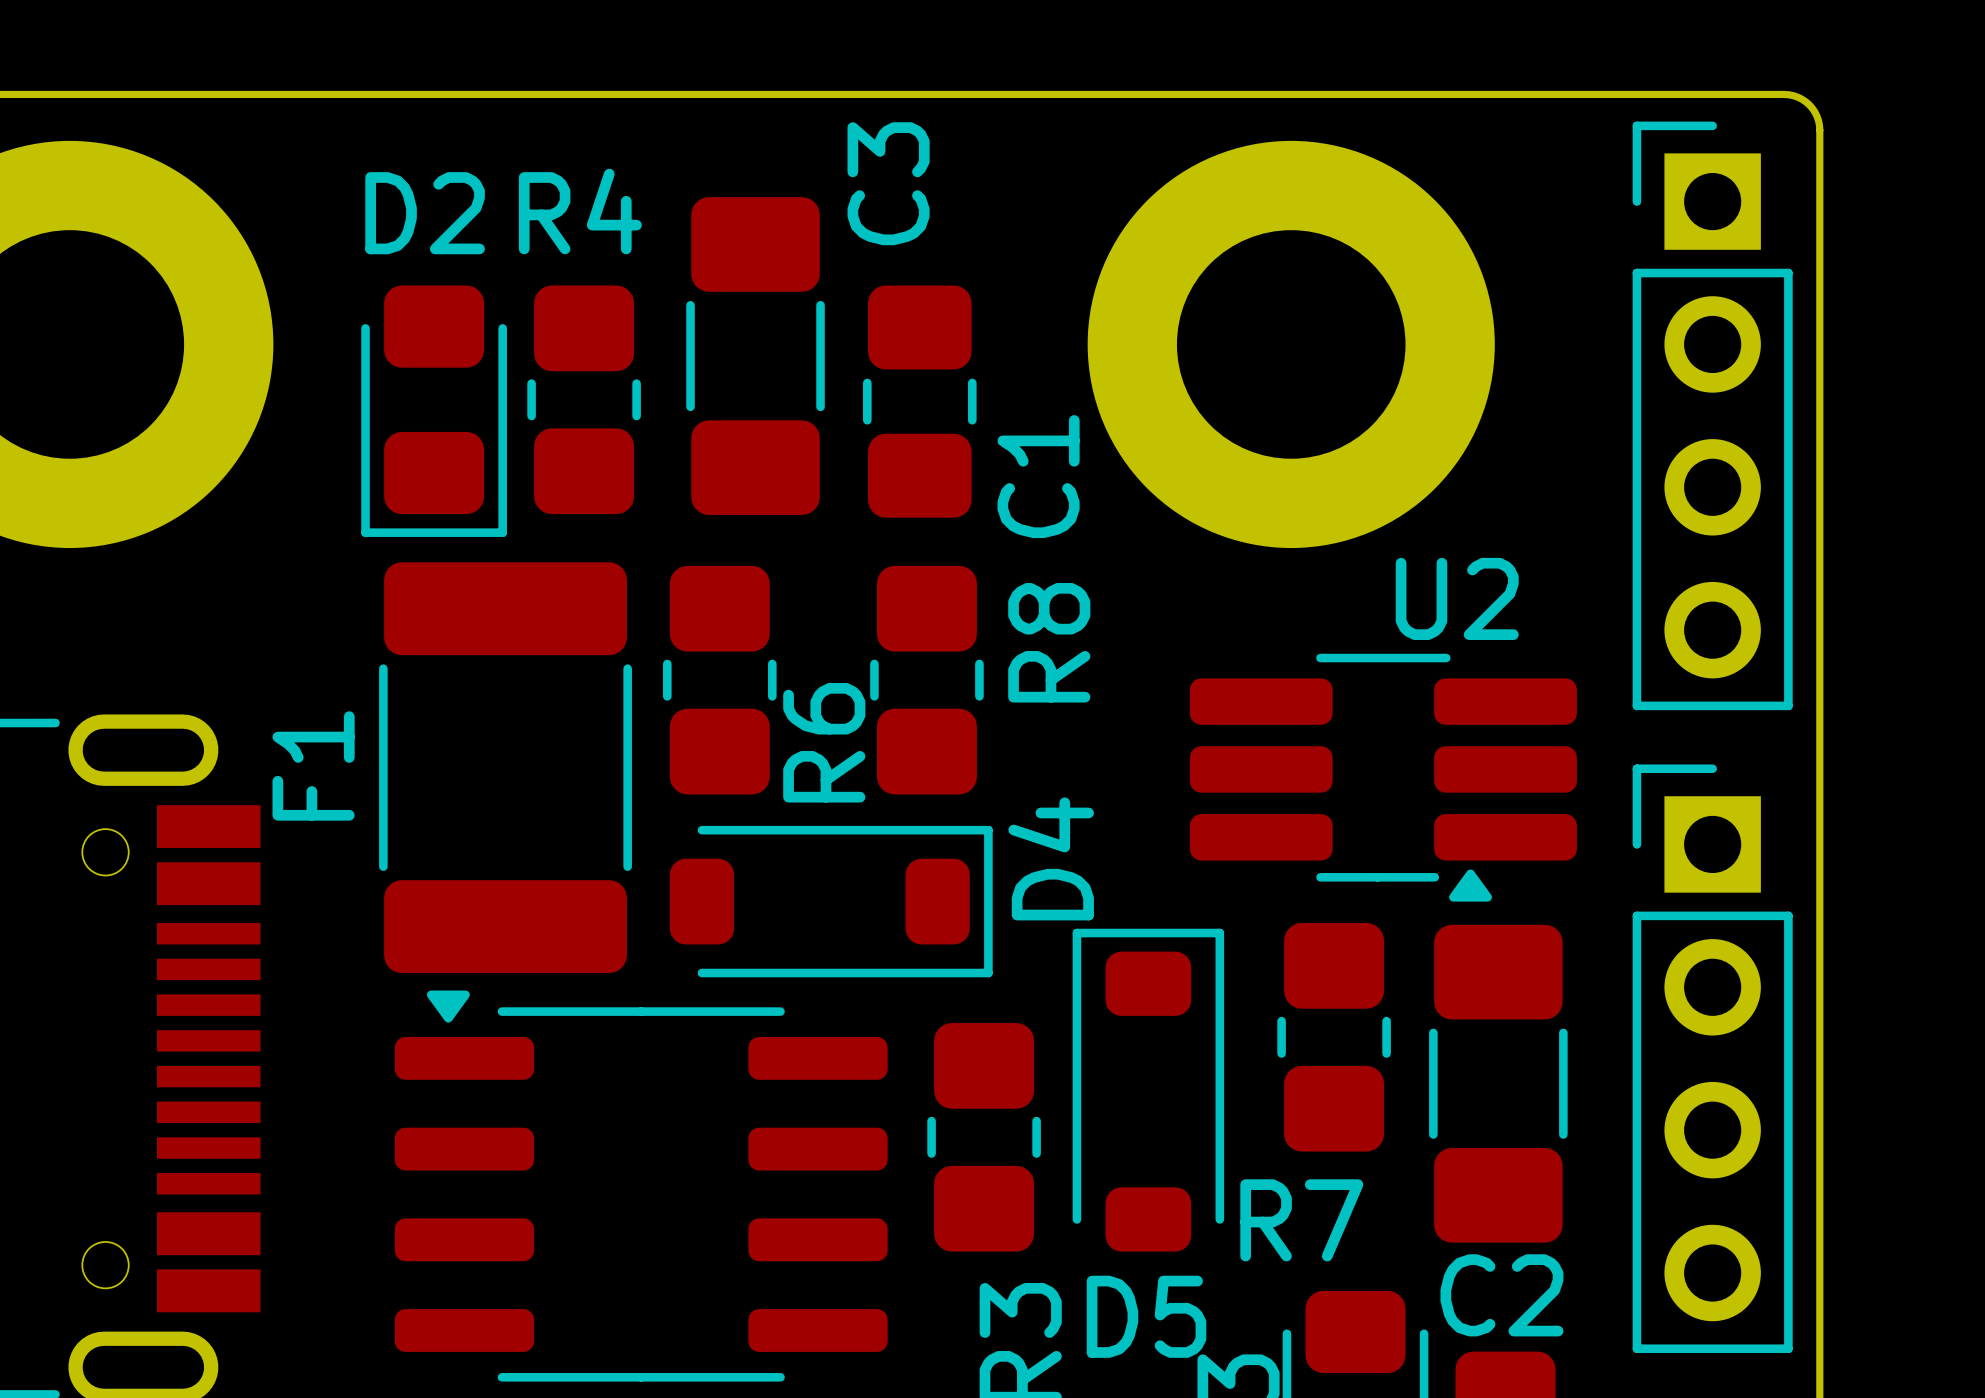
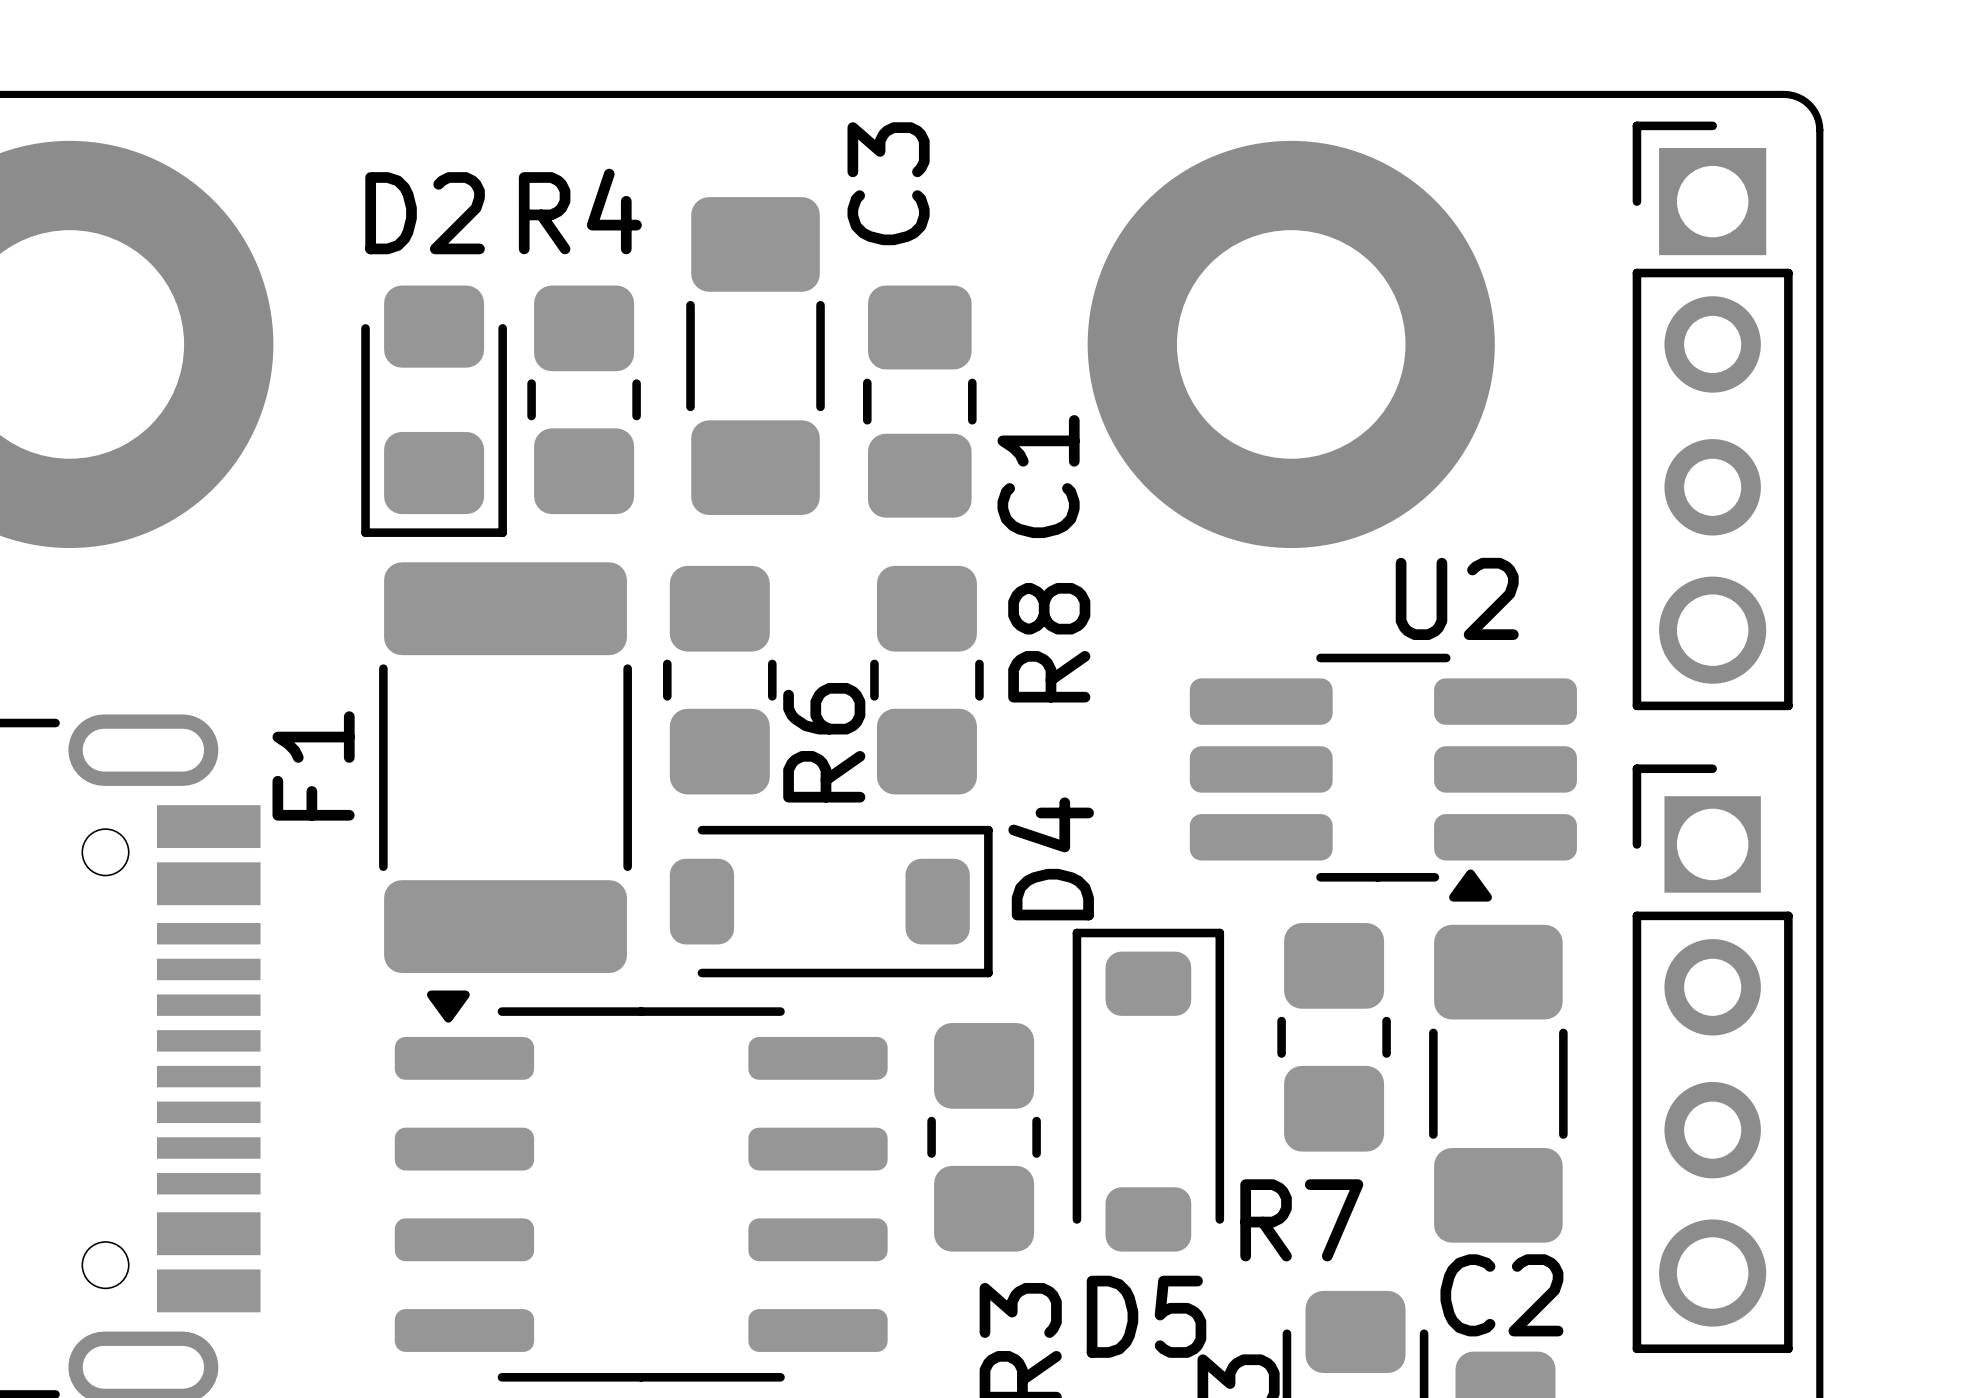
part footprint: [1632, 121, 1793, 711] -> [1632, 121, 1793, 711]
part footprint: [1632, 764, 1793, 1354] -> [1632, 764, 1793, 1354]

